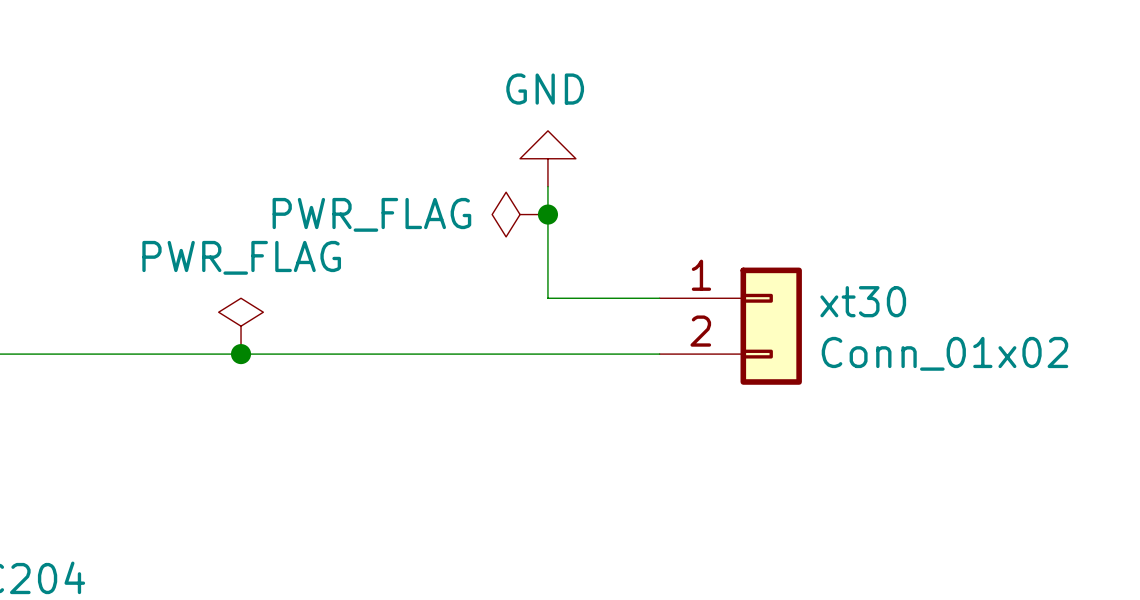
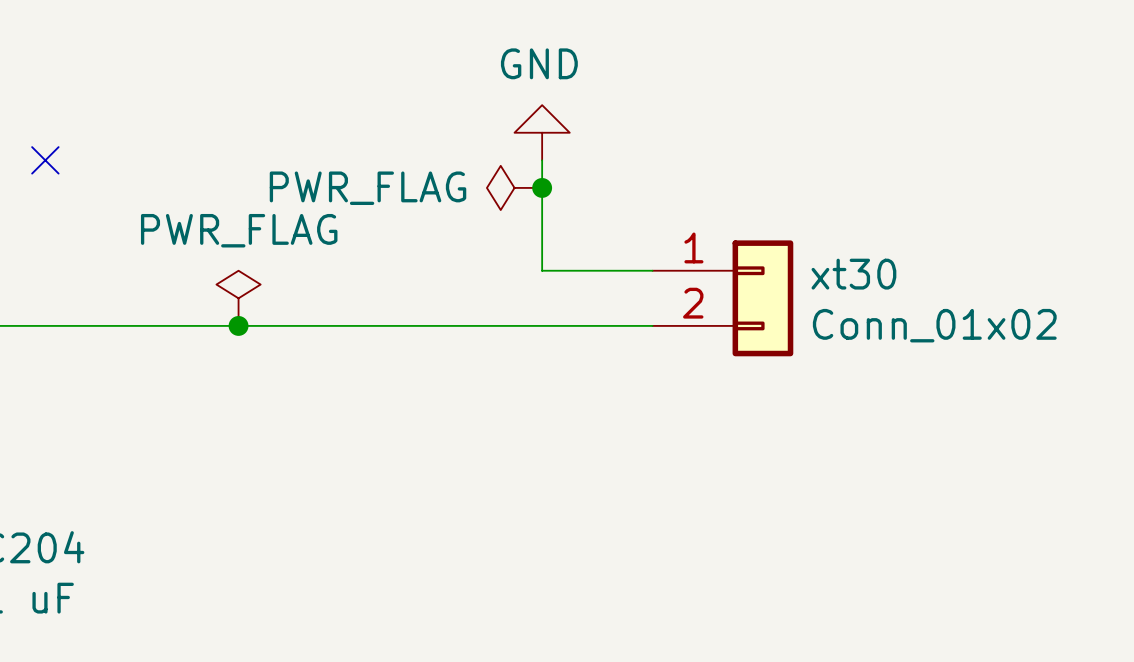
no-connect mark: none -> (45, 160)

